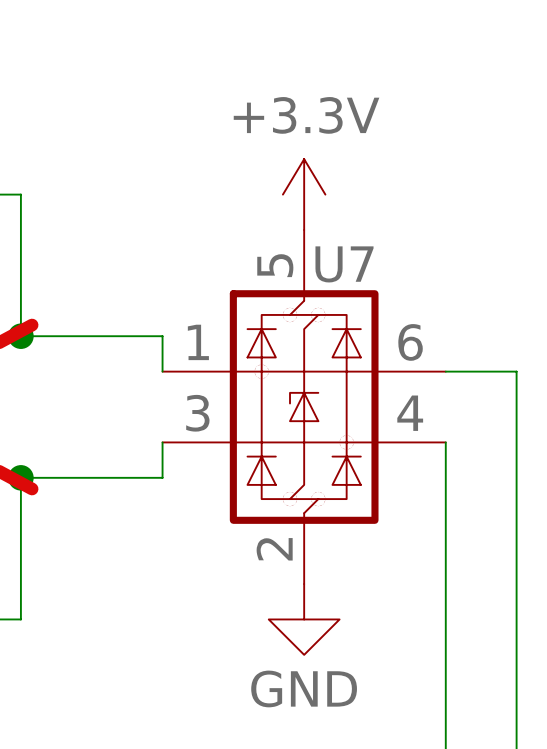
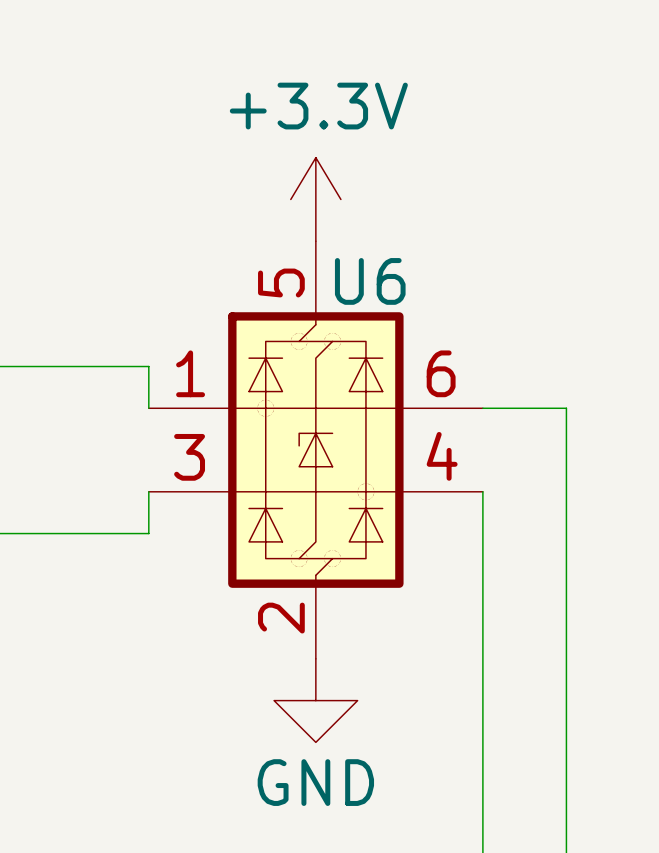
U7 name: U7 (344, 264) -> U6 (370, 281)

